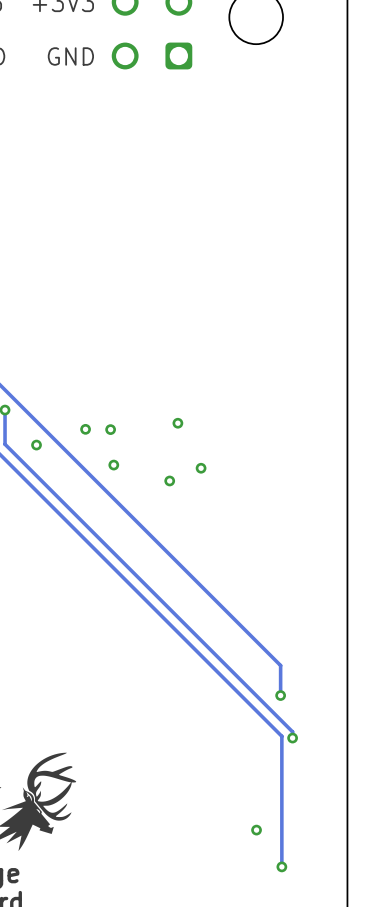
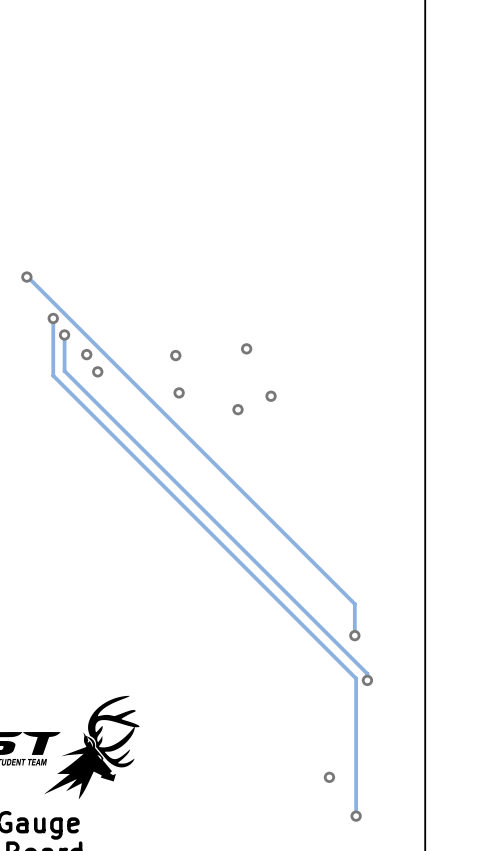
via position: (85, 429) -> (86, 354)

